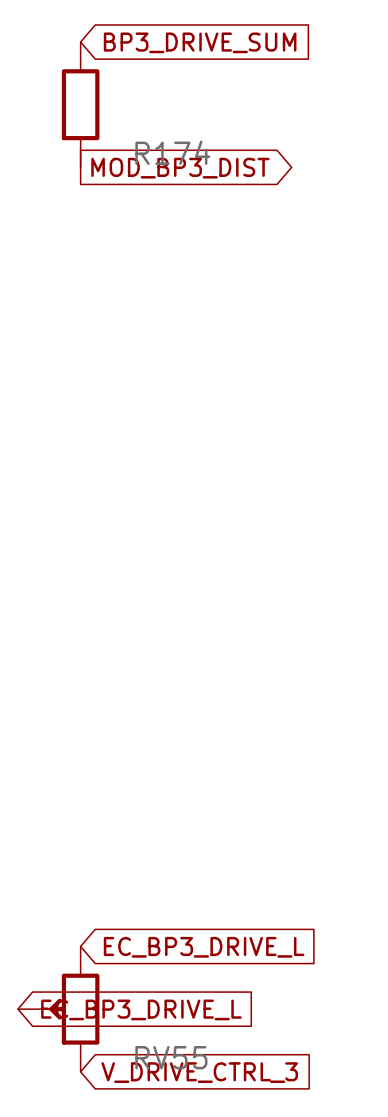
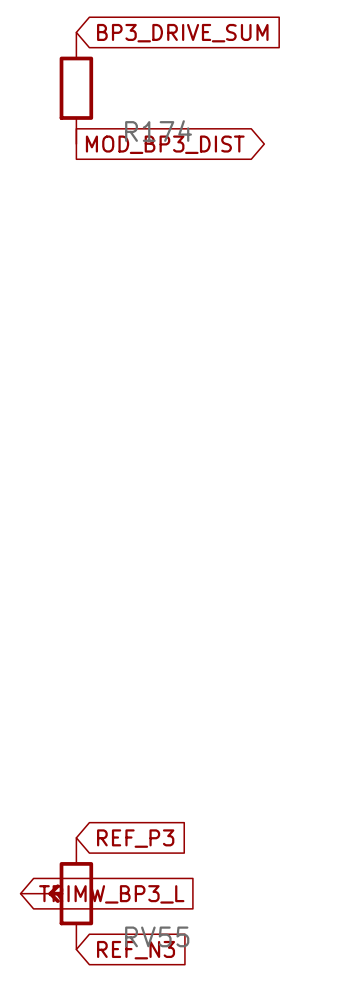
global label: EC_BP3_DRIVE_L (204, 947) -> REF_P3 (135, 838)
global label: EC_BP3_DRIVE_L (141, 1009) -> TRIMW_BP3_L (111, 894)
global label: V_DRIVE_CTRL_3 (199, 1072) -> REF_N3 (136, 950)

